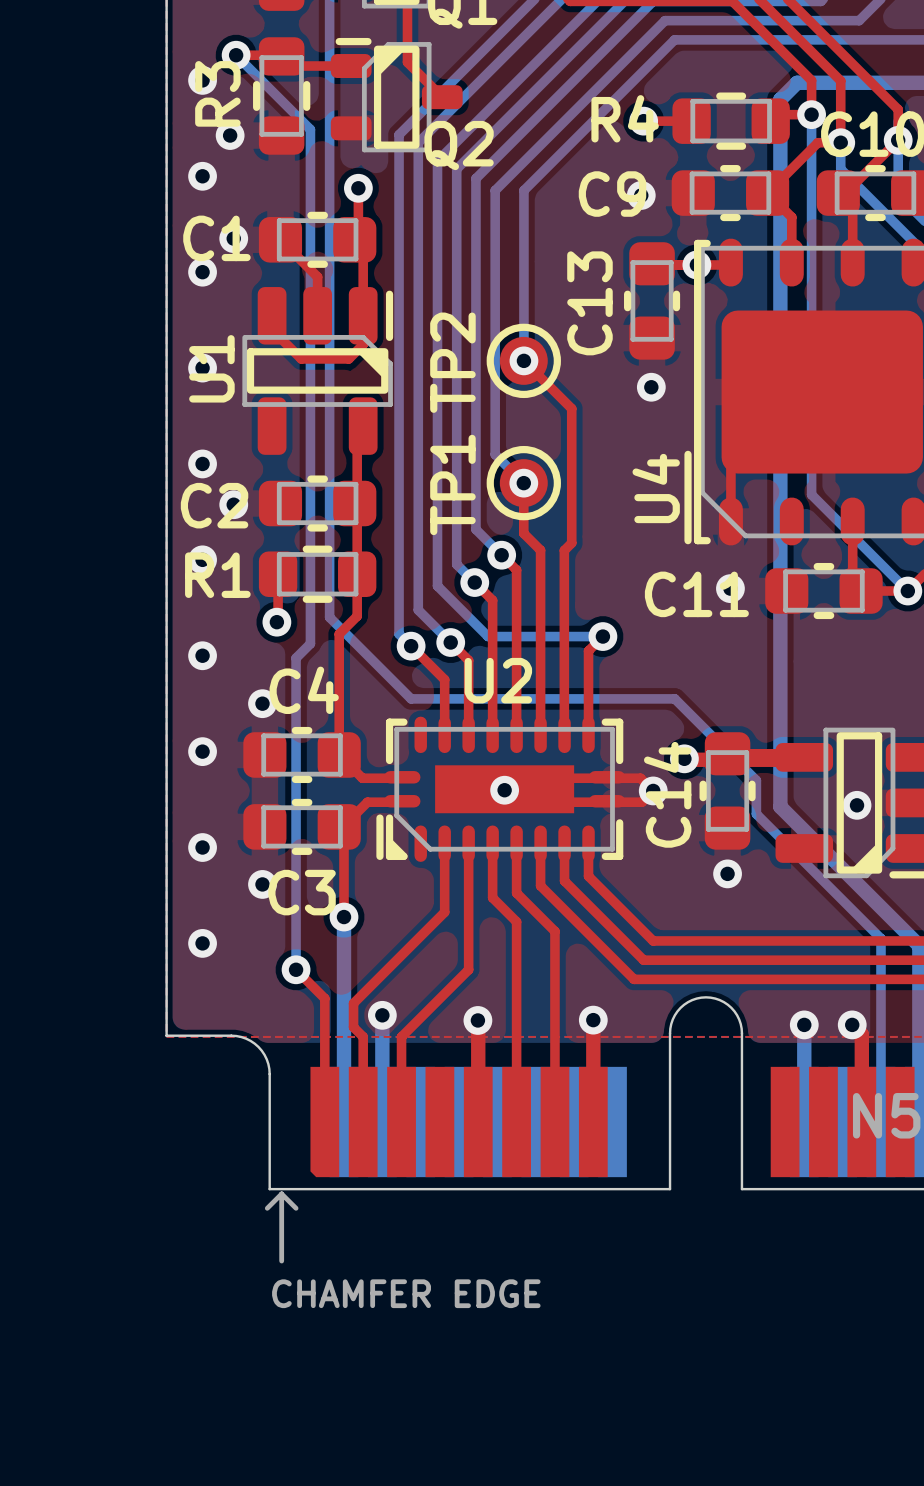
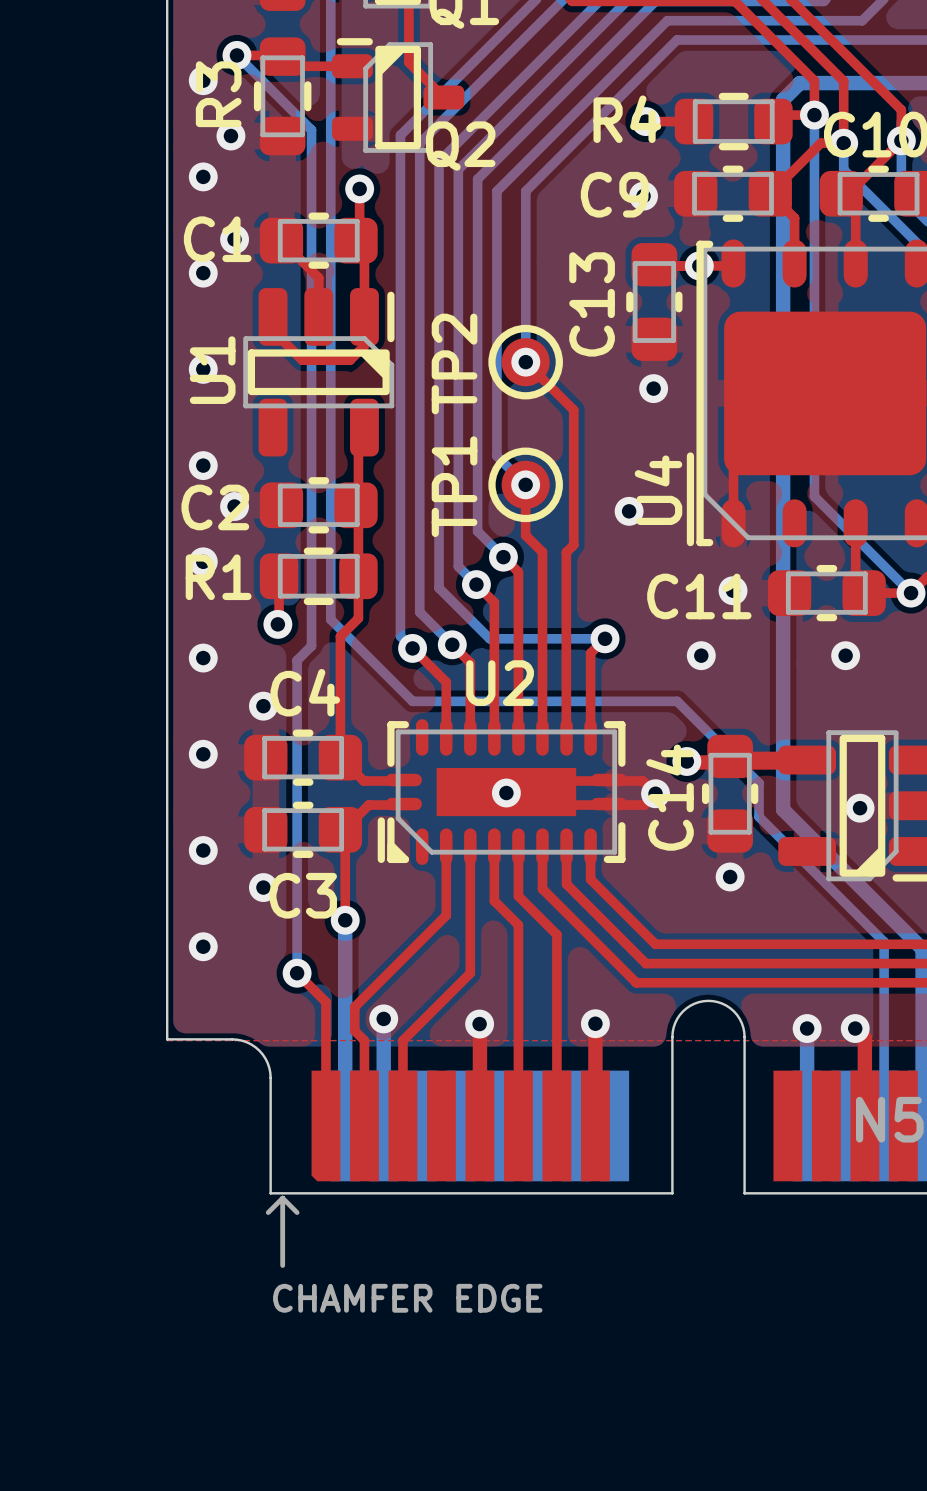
via: none -> (629, 511)
via: none -> (701, 655)
via: none -> (845, 655)

